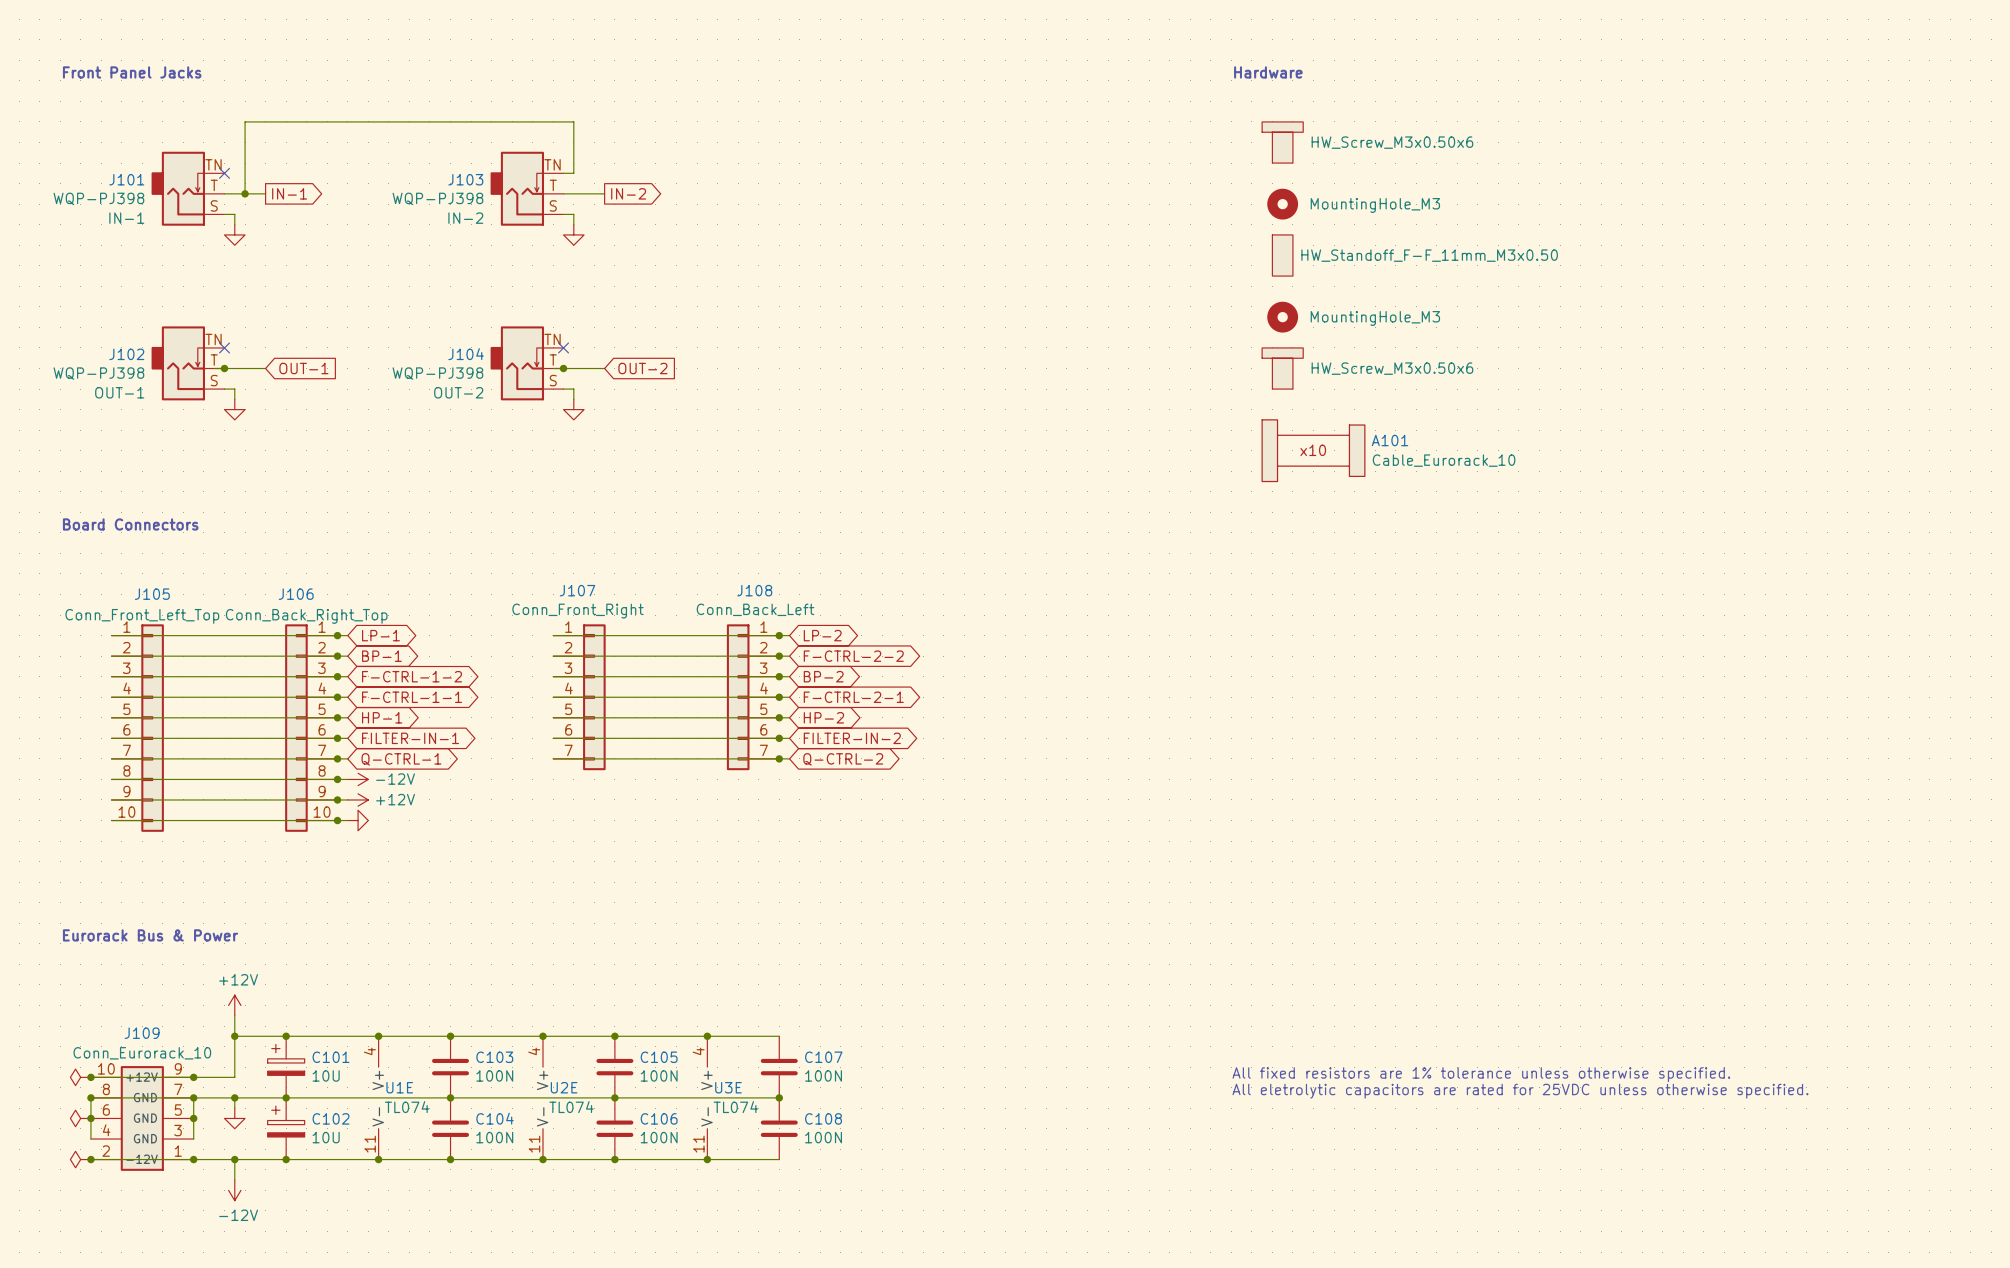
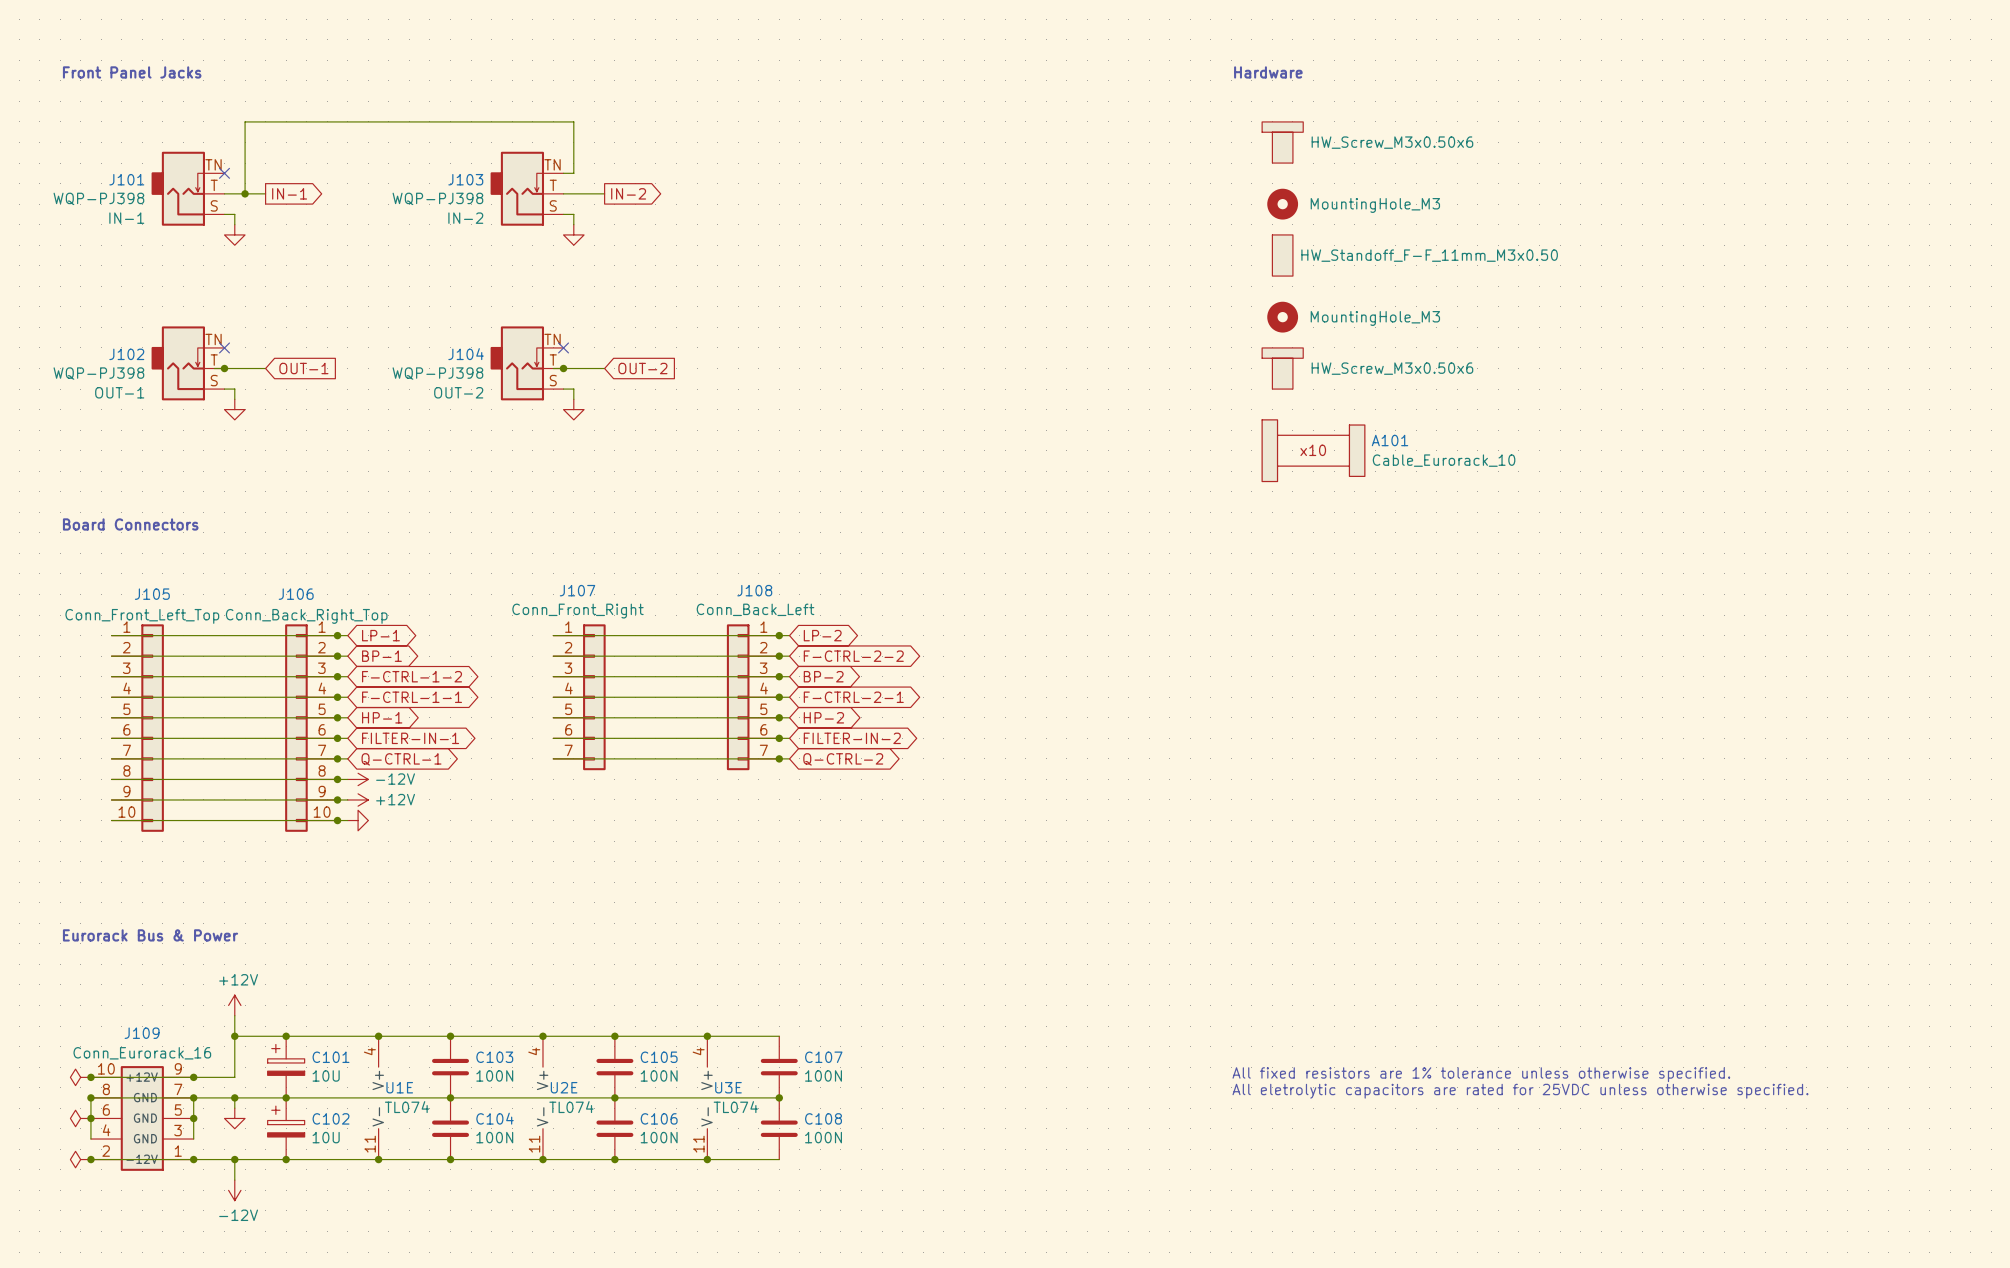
J109 value: Conn_Eurorack_10 (142, 1053) -> Conn_Eurorack_16 (142, 1053)

